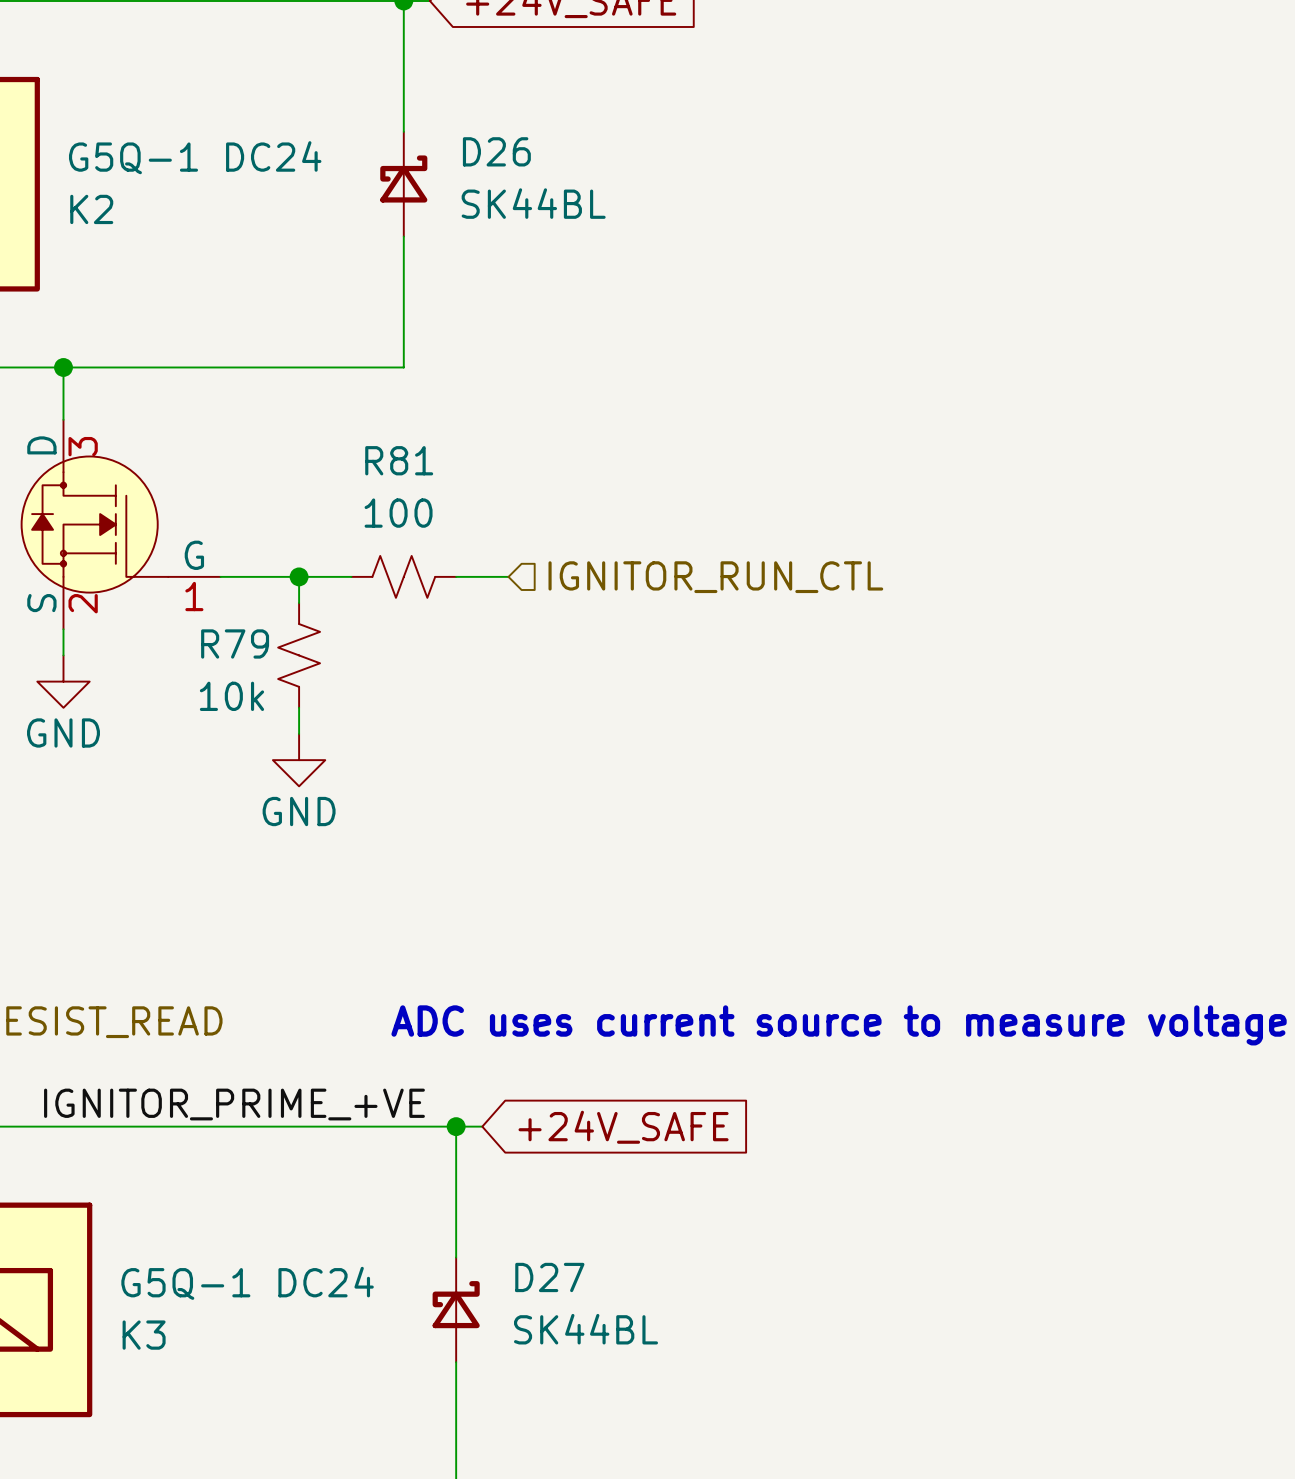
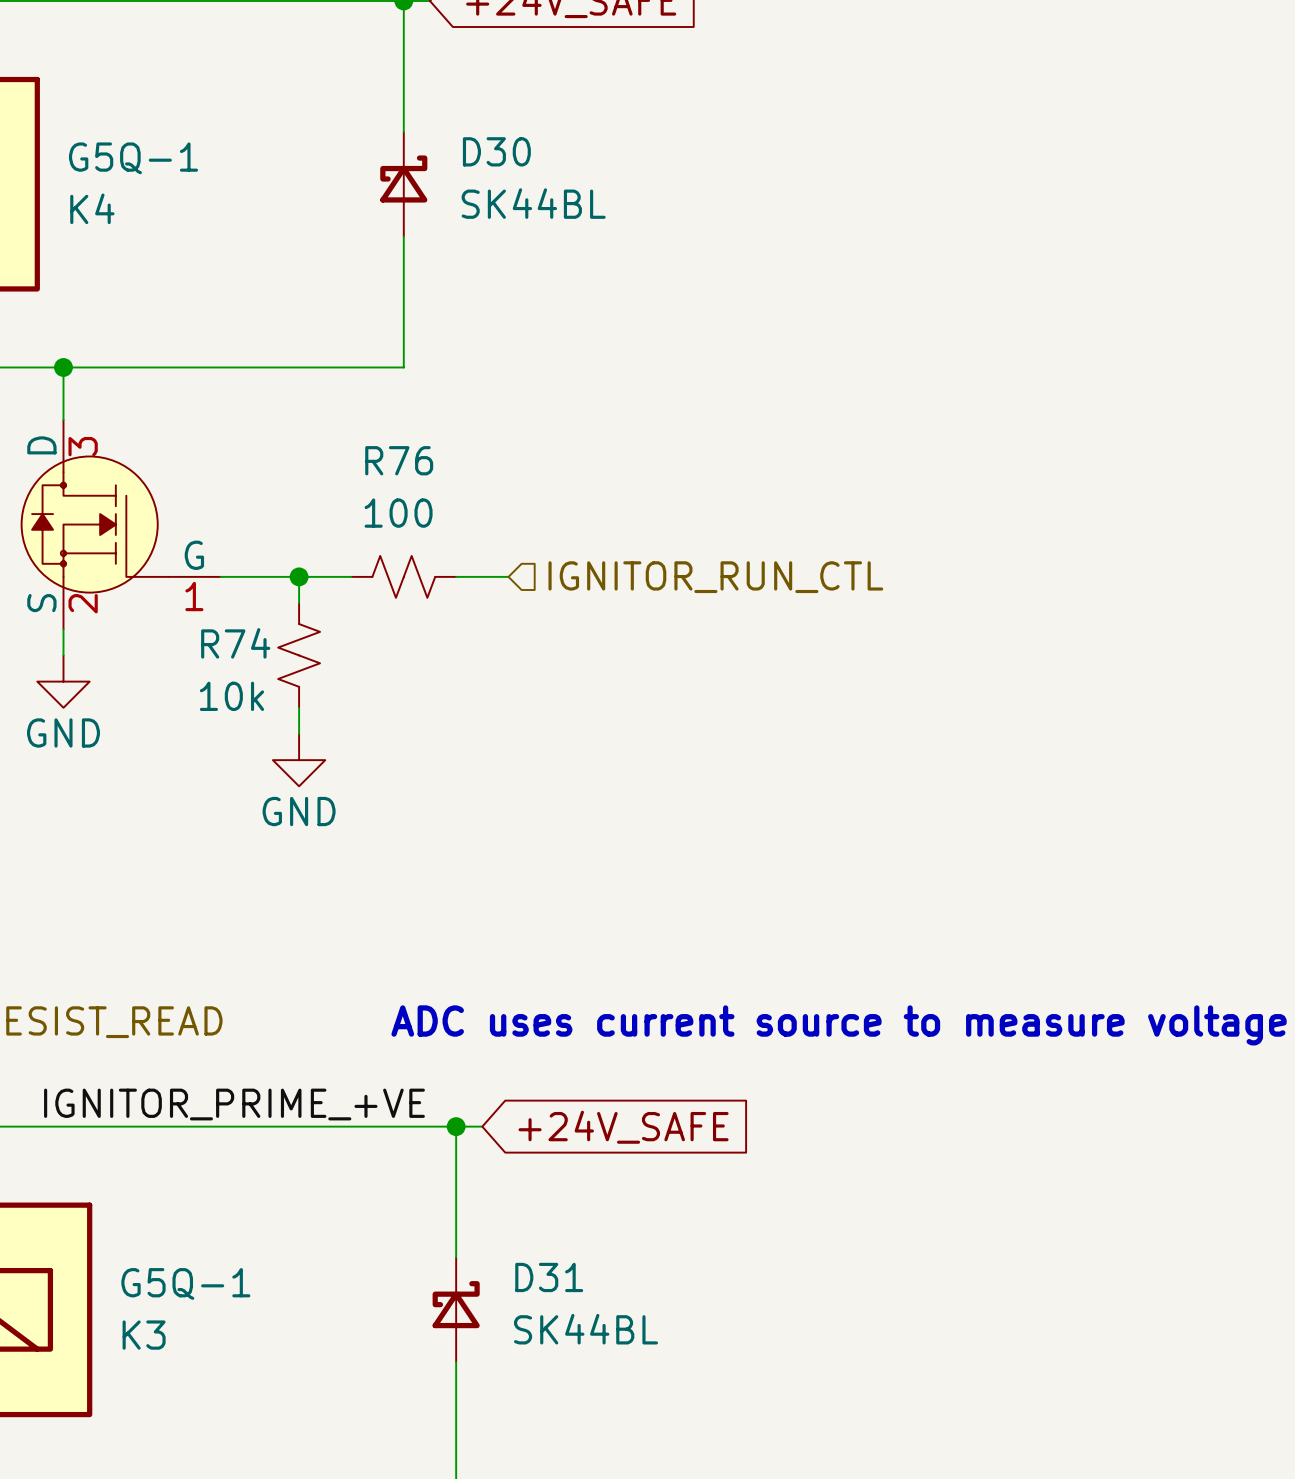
D26 name: D26 (496, 151) -> D30 (496, 151)
K2 value: G5Q-1 DC24 (195, 157) -> G5Q-1 (133, 158)
K2 name: K2 (91, 209) -> K4 (92, 208)
R81 name: R81 (399, 460) -> R76 (399, 460)
R79 name: R79 (235, 643) -> R74 (235, 643)
D27 name: D27 (549, 1277) -> D31 (549, 1277)
K3 value: G5Q-1 DC24 (247, 1283) -> G5Q-1 (185, 1283)

